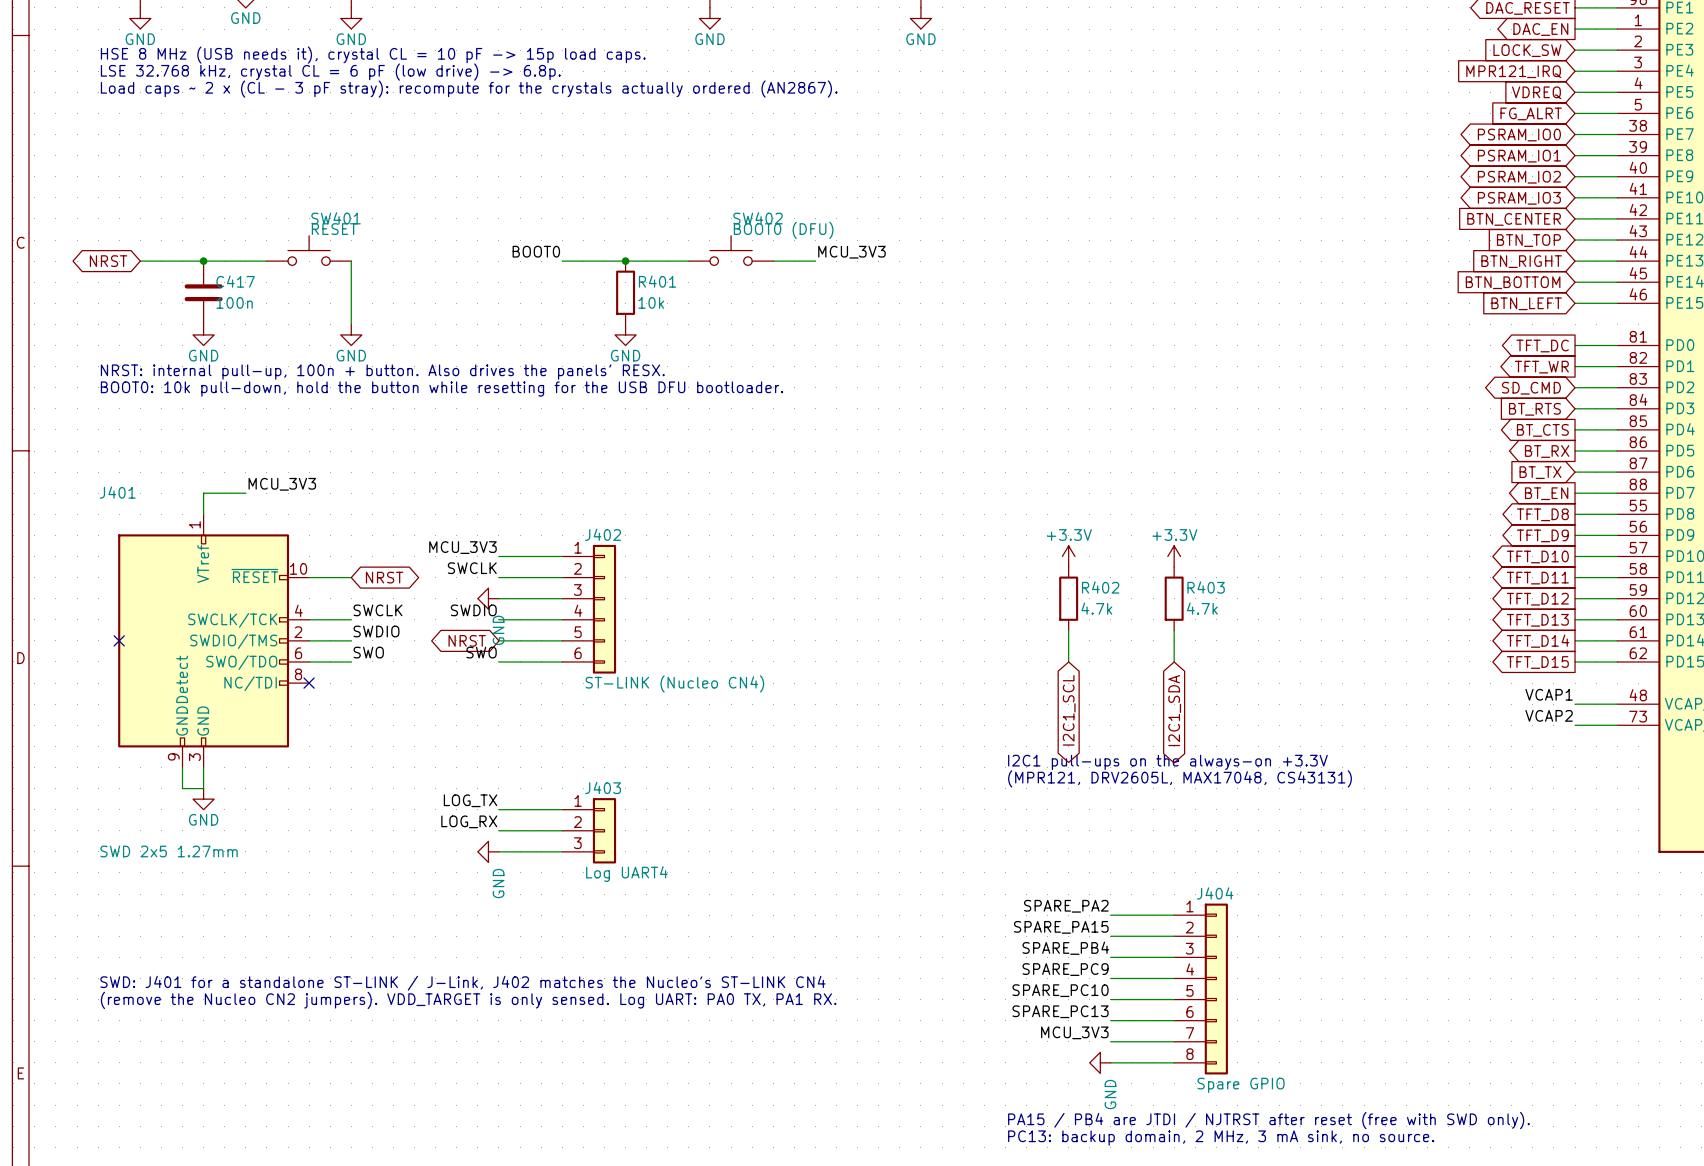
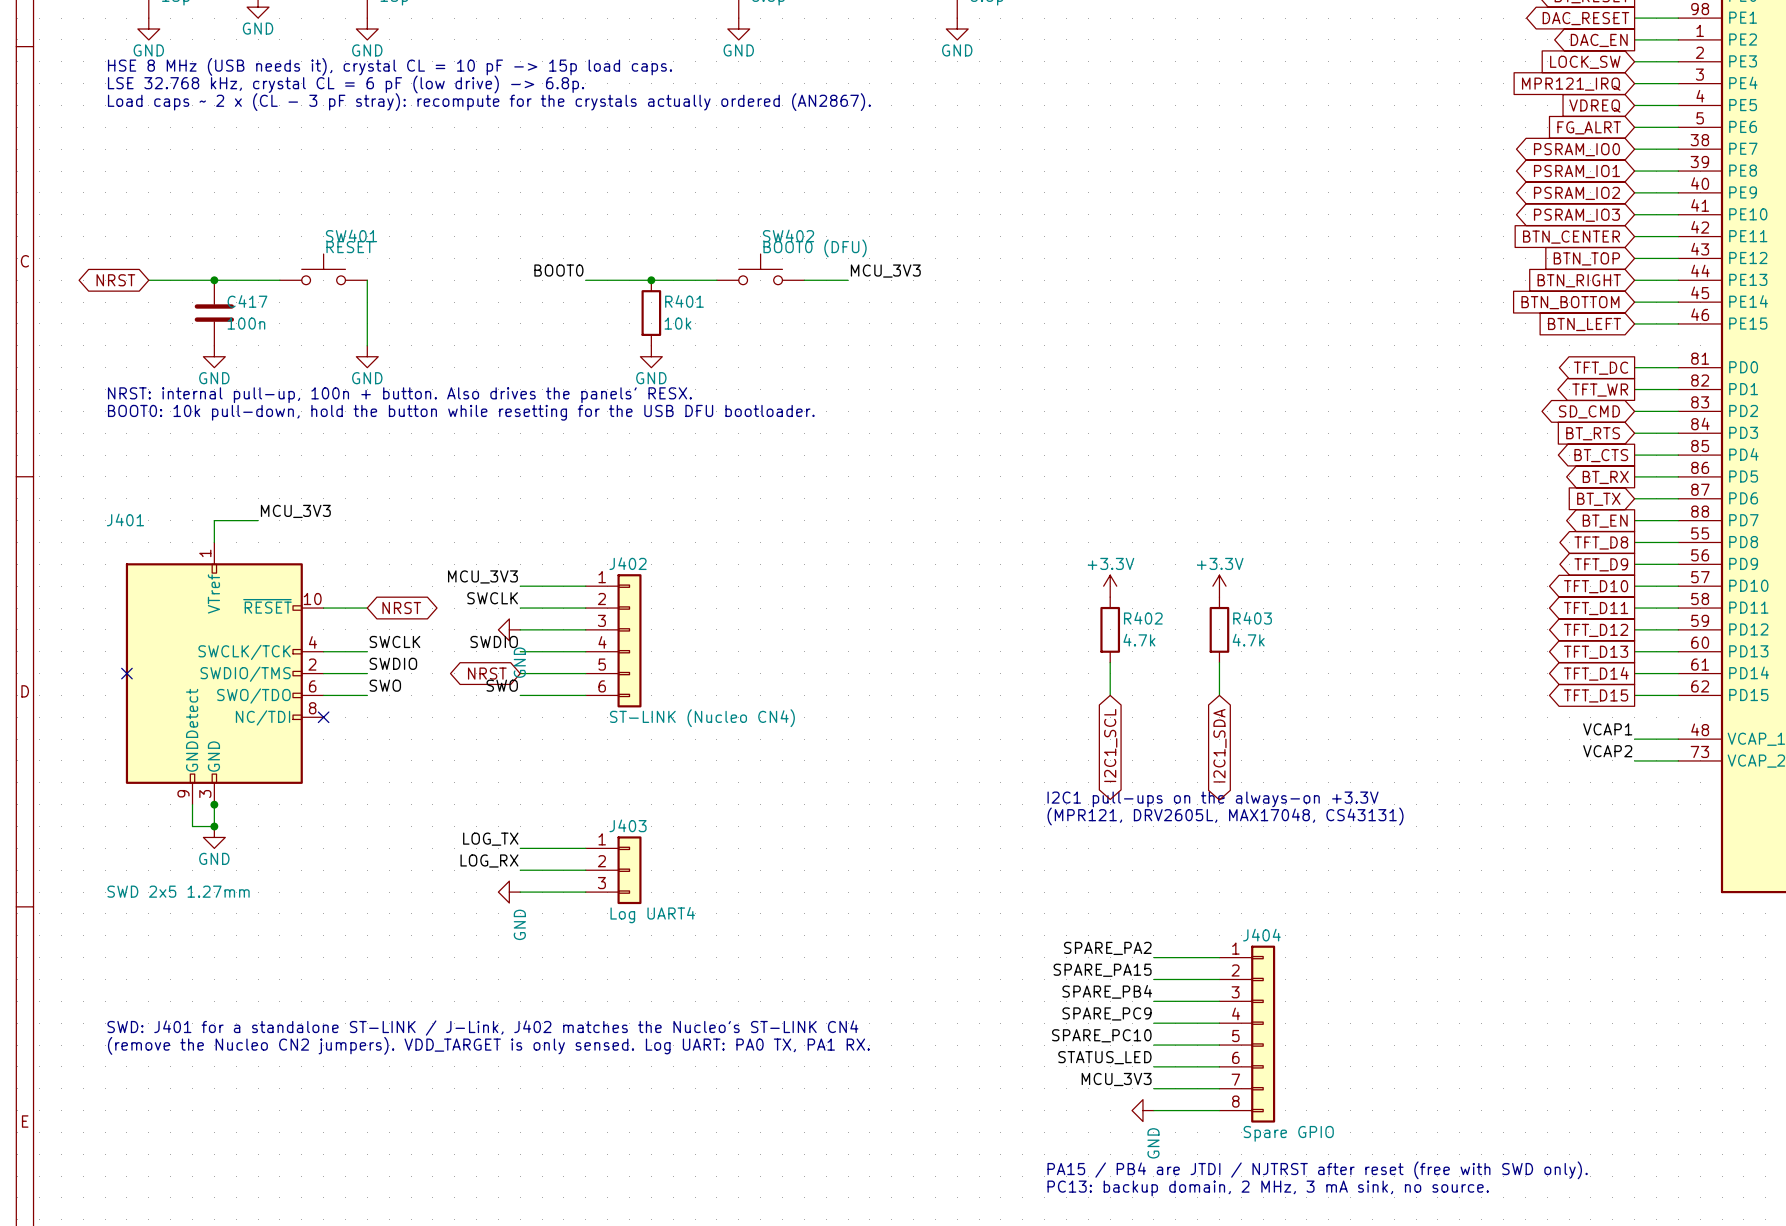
junction: none -> (214, 804)
junction: none -> (214, 826)
label: SPARE_PC13 (1060, 1011) -> STATUS_LED (1104, 1057)

